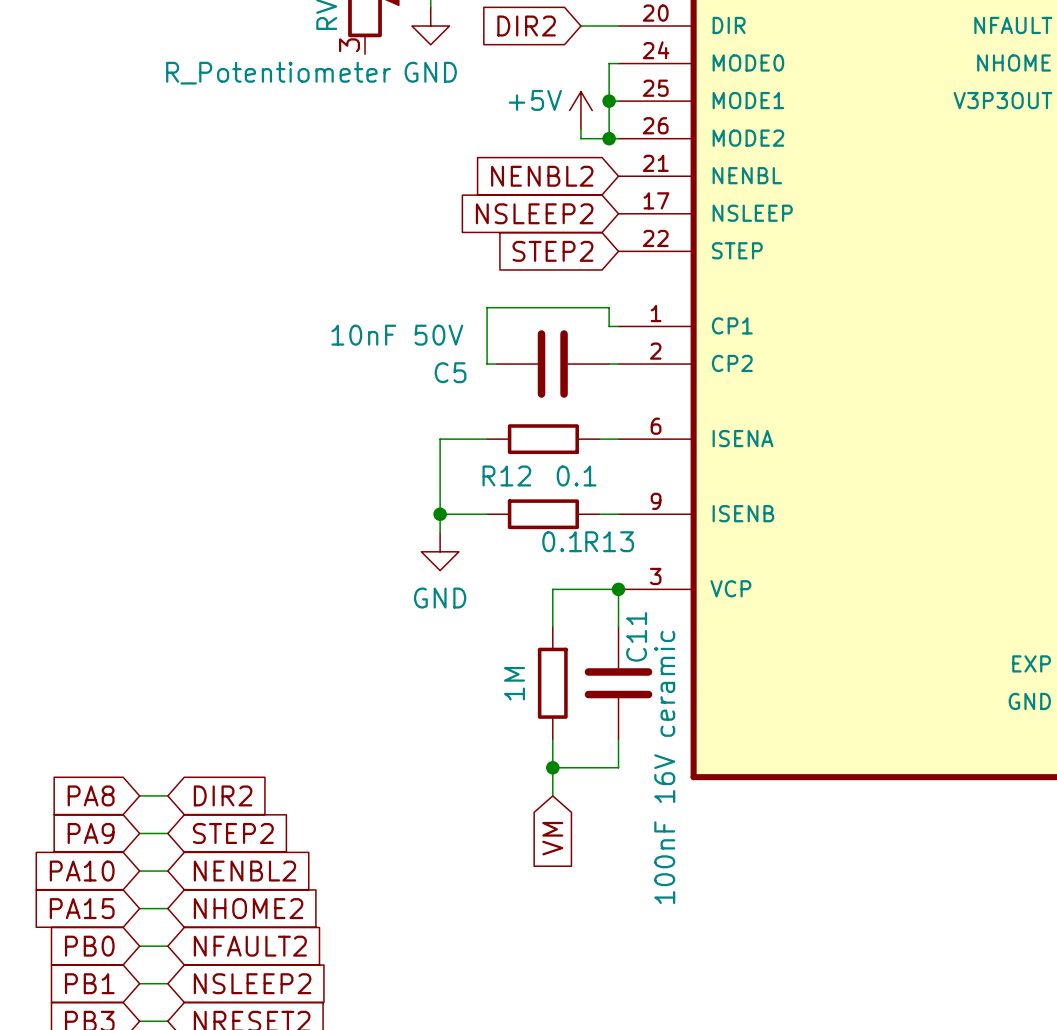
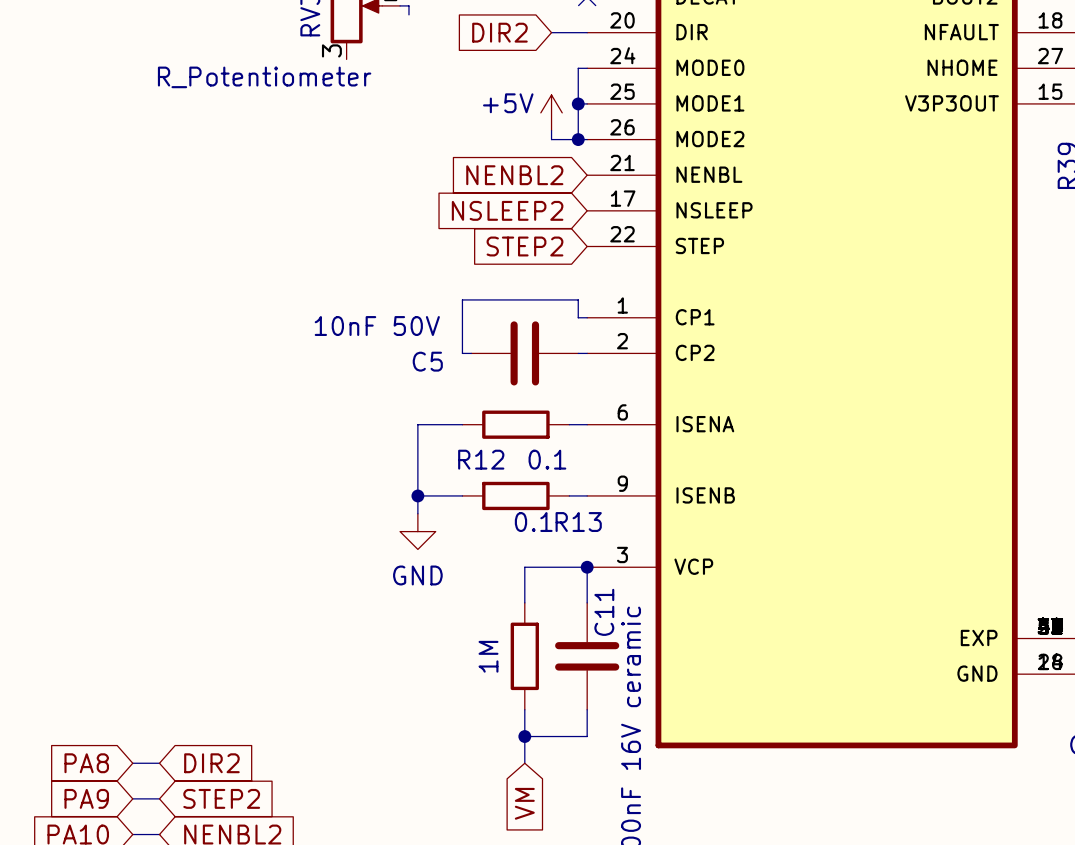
power symbol: GND (430, 26) -> none

